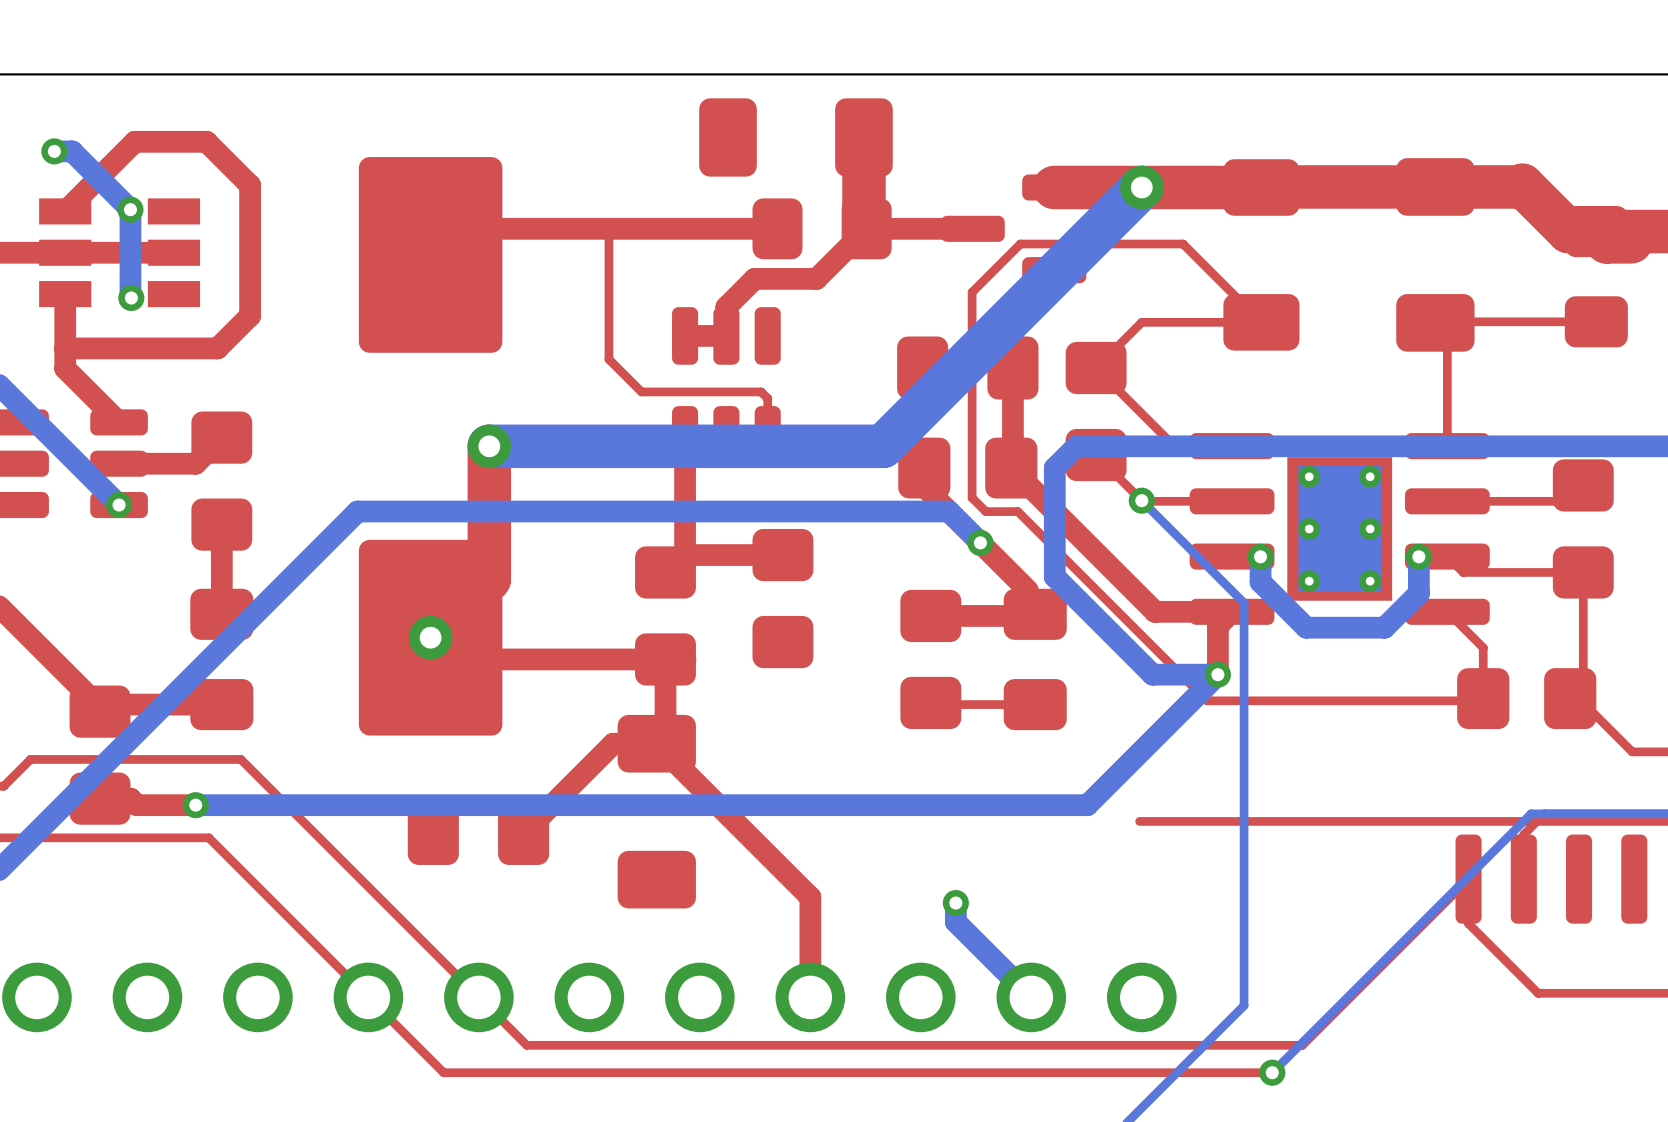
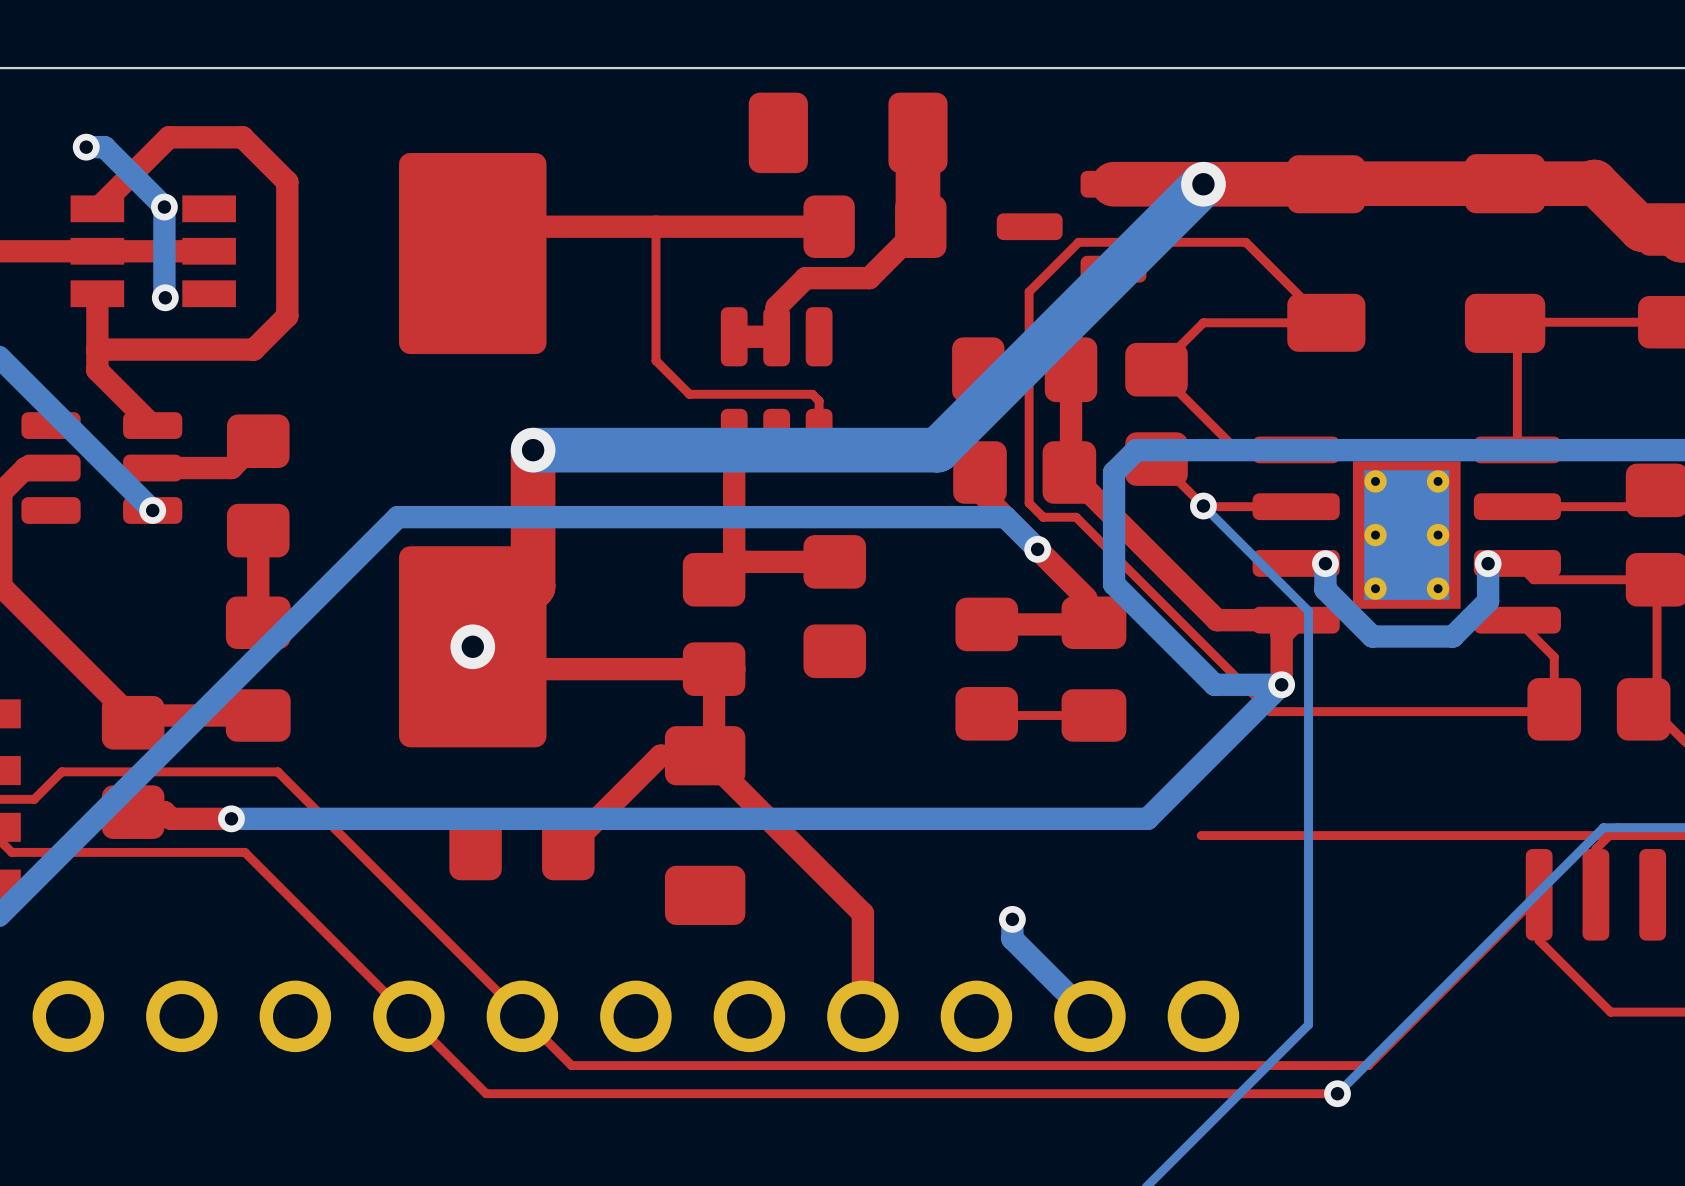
top track: (972, 228) (866, 228) -> none

